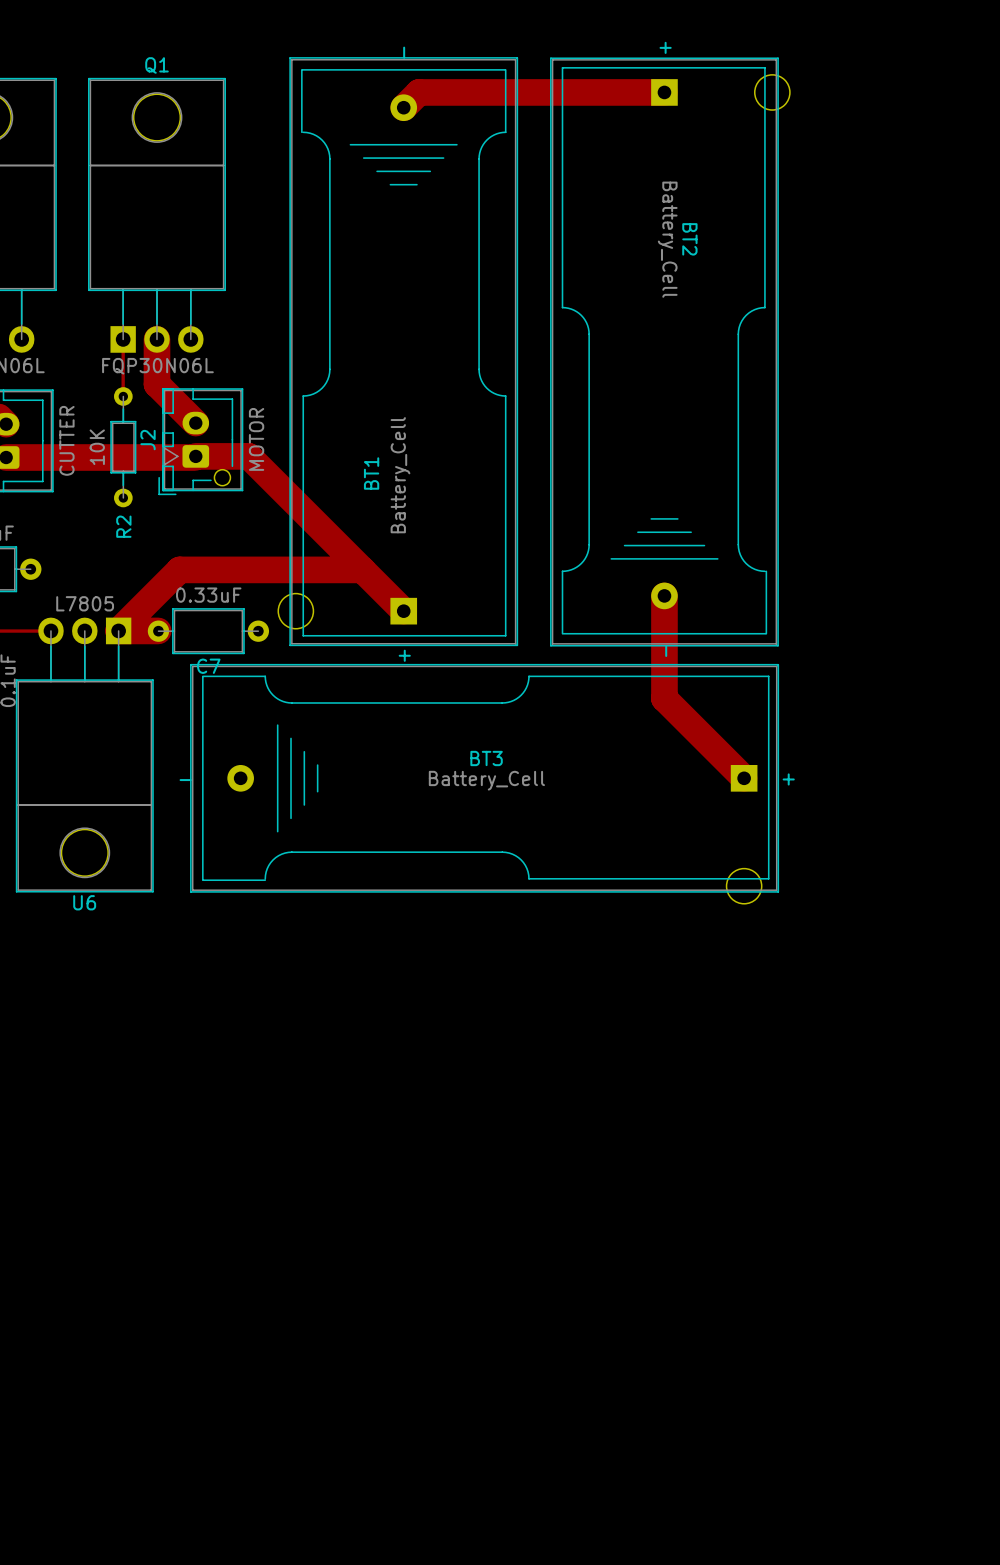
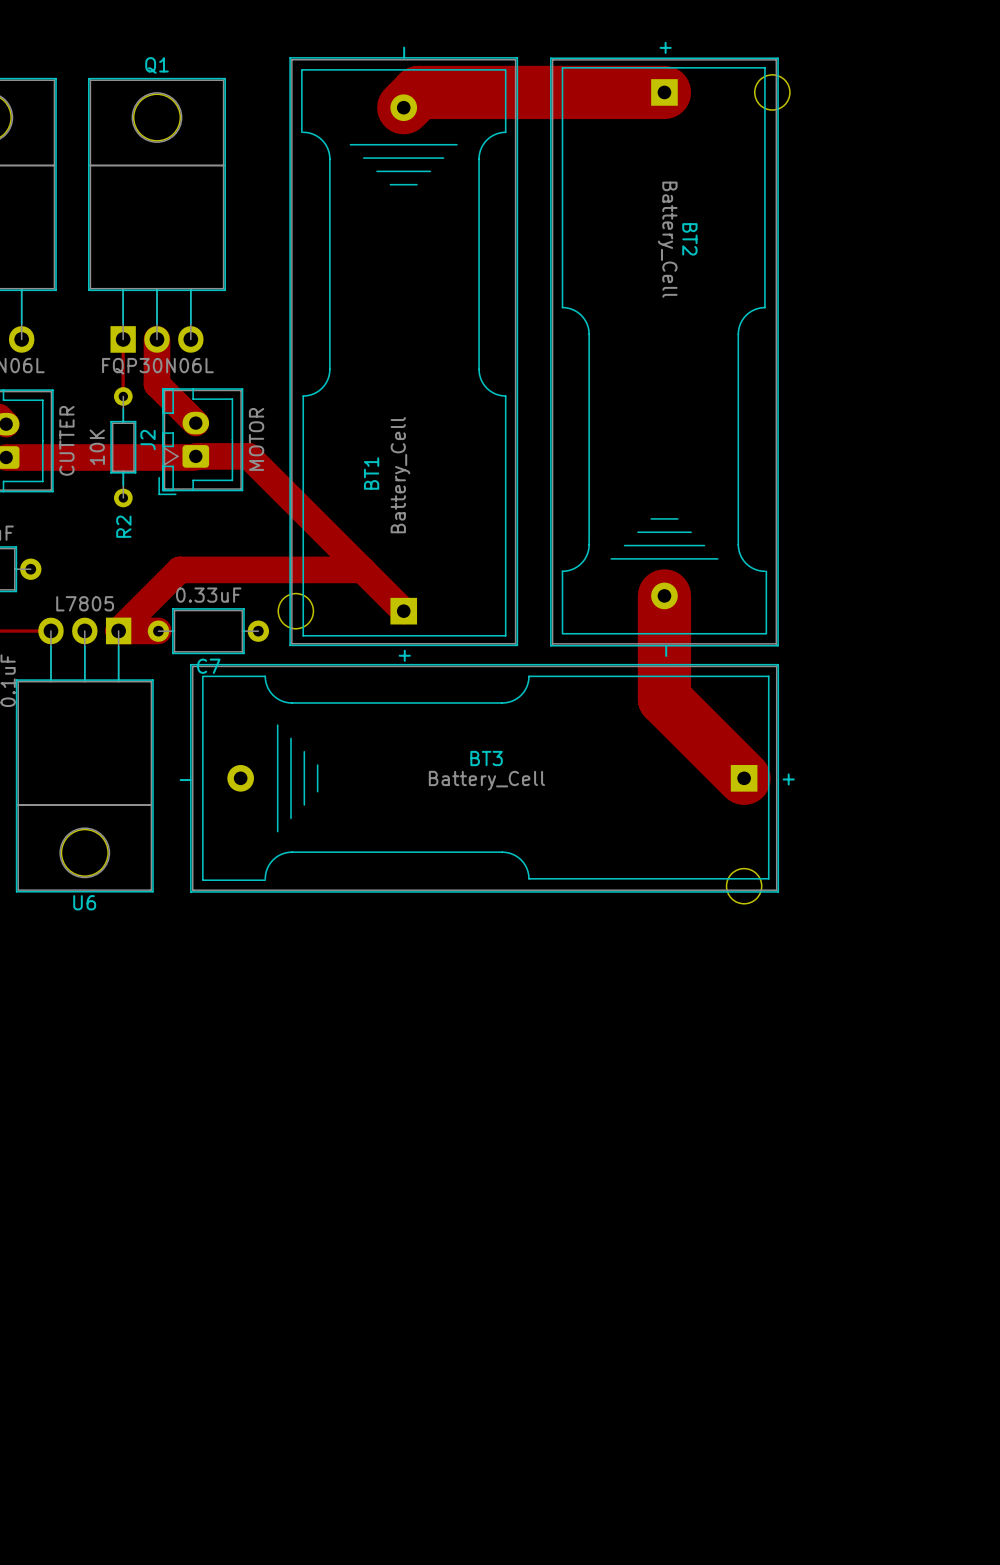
track width: thin (664, 92) (418, 92) (403, 107) -> thick (664, 92) (418, 92) (403, 107)
J2 footprint: [158, 388, 244, 496] -> [158, 388, 244, 496]
track width: thin (664, 595) (664, 698) (744, 778) -> thick (664, 595) (664, 698) (744, 778)

